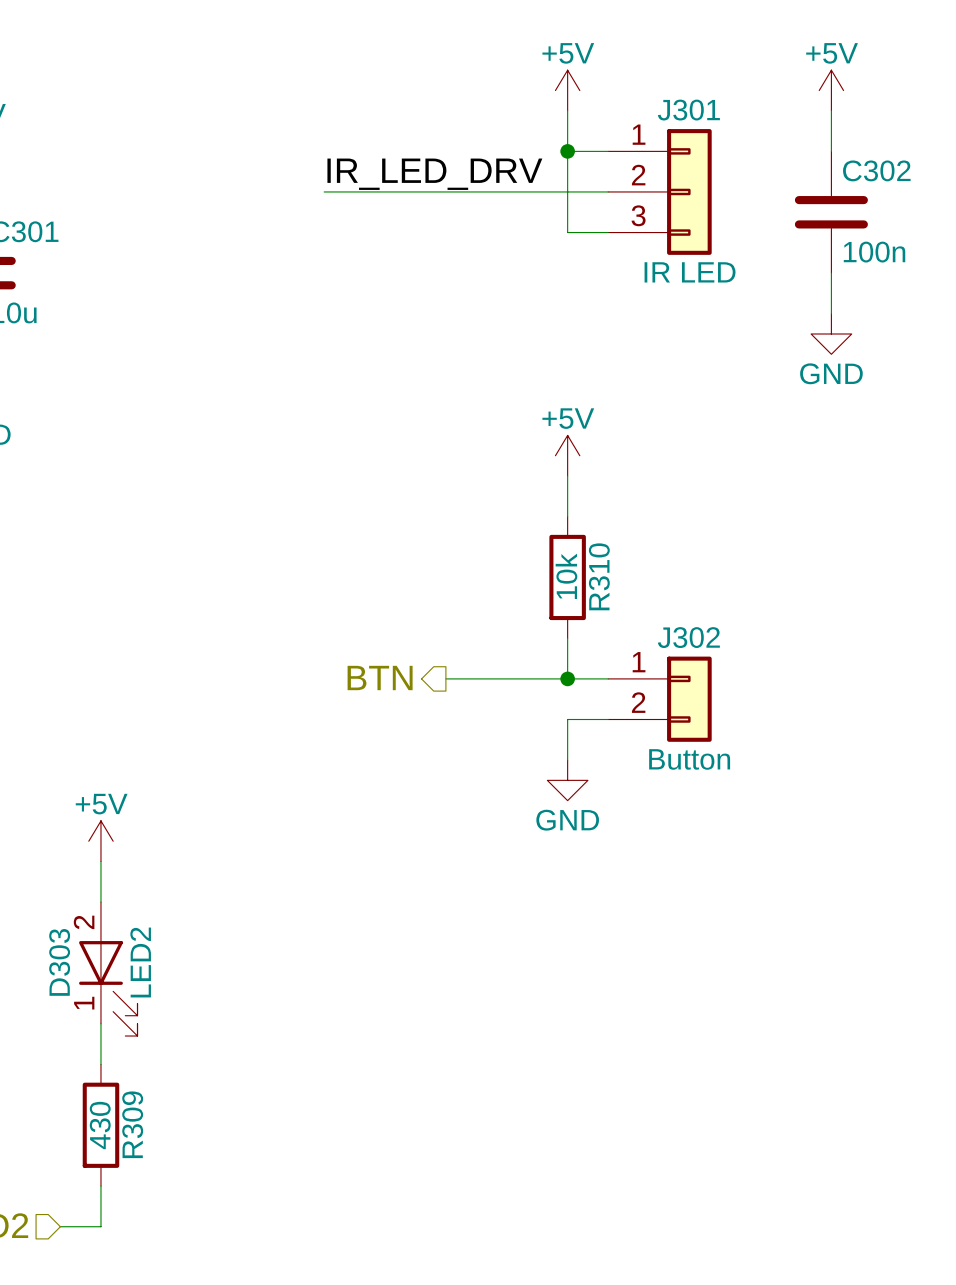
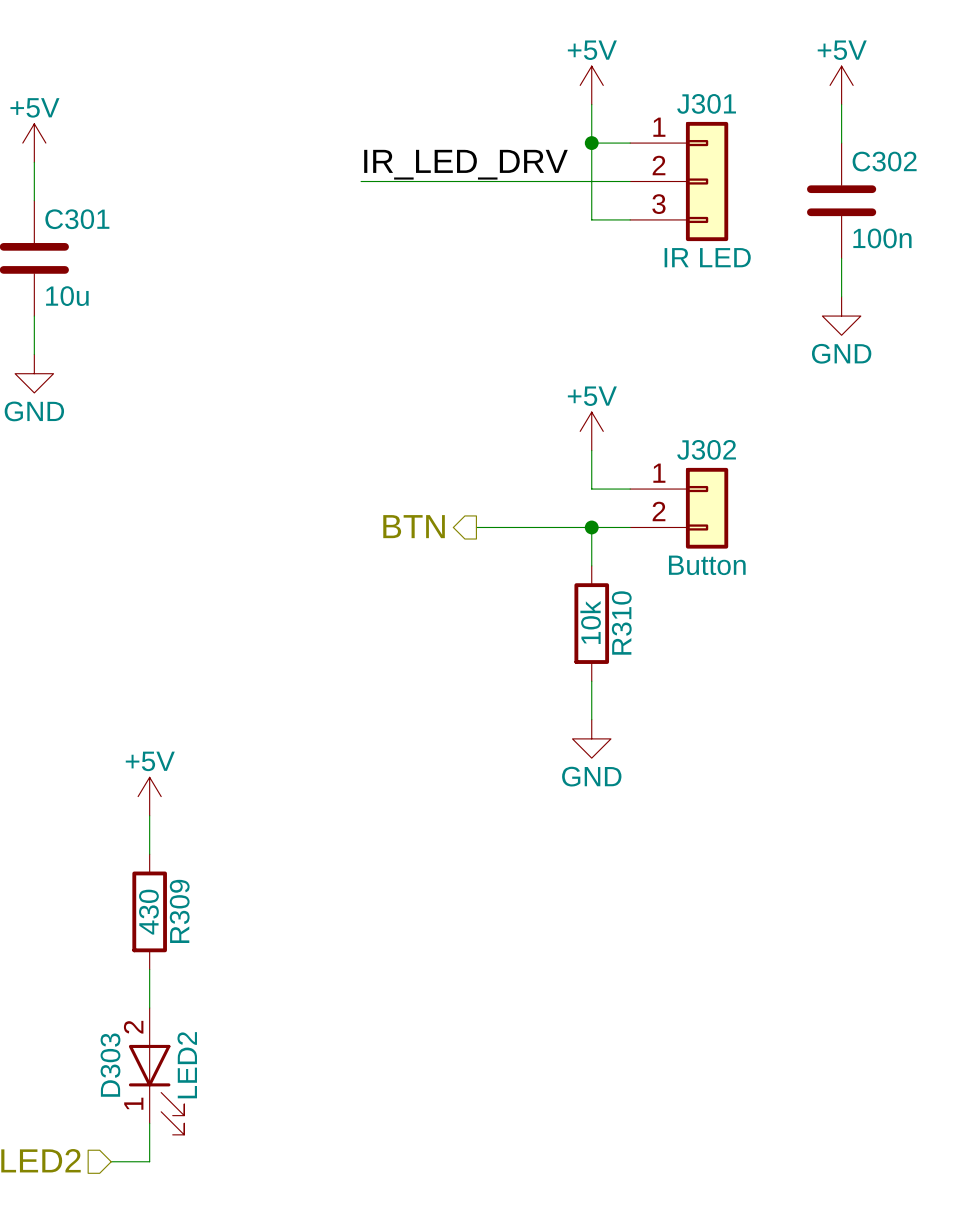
junction: none -> (591, 527)
R310 position: (567, 577) -> (591, 623)
wire: (567, 638) (567, 678) -> (591, 527) (591, 565)
hierarchical label position: BTN (380, 678) -> BTN (414, 526)
wire: (445, 678) (608, 678) -> (476, 527) (630, 527)
junction: (567, 678) -> none
J302 position: (659, 699) -> (679, 508)
wire: (567, 719) (608, 719) -> (591, 489) (630, 489)
D303 position: (108, 969) -> (156, 1071)
R309 position: (100, 1125) -> (149, 911)

